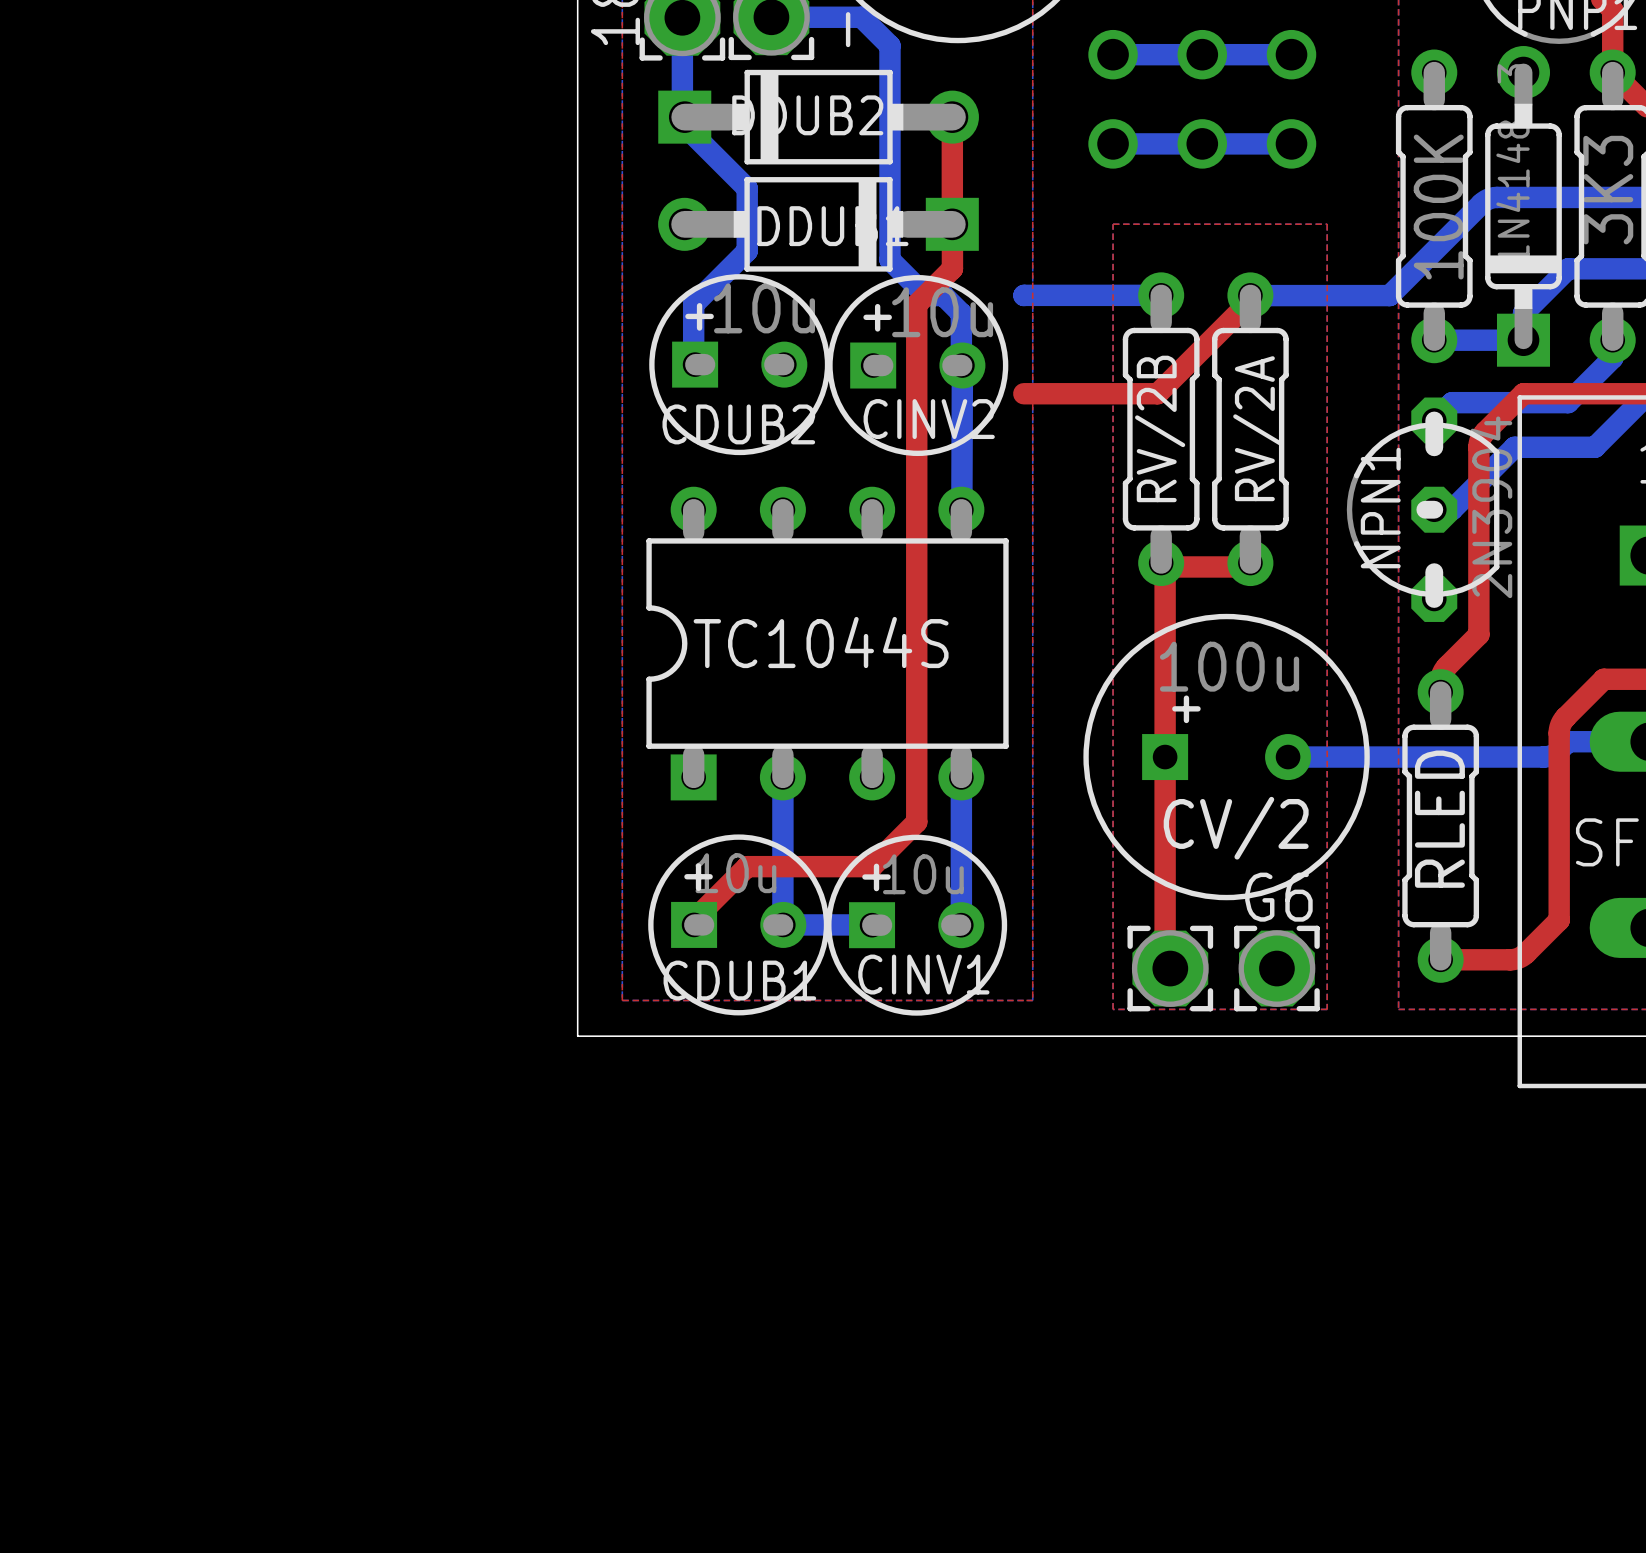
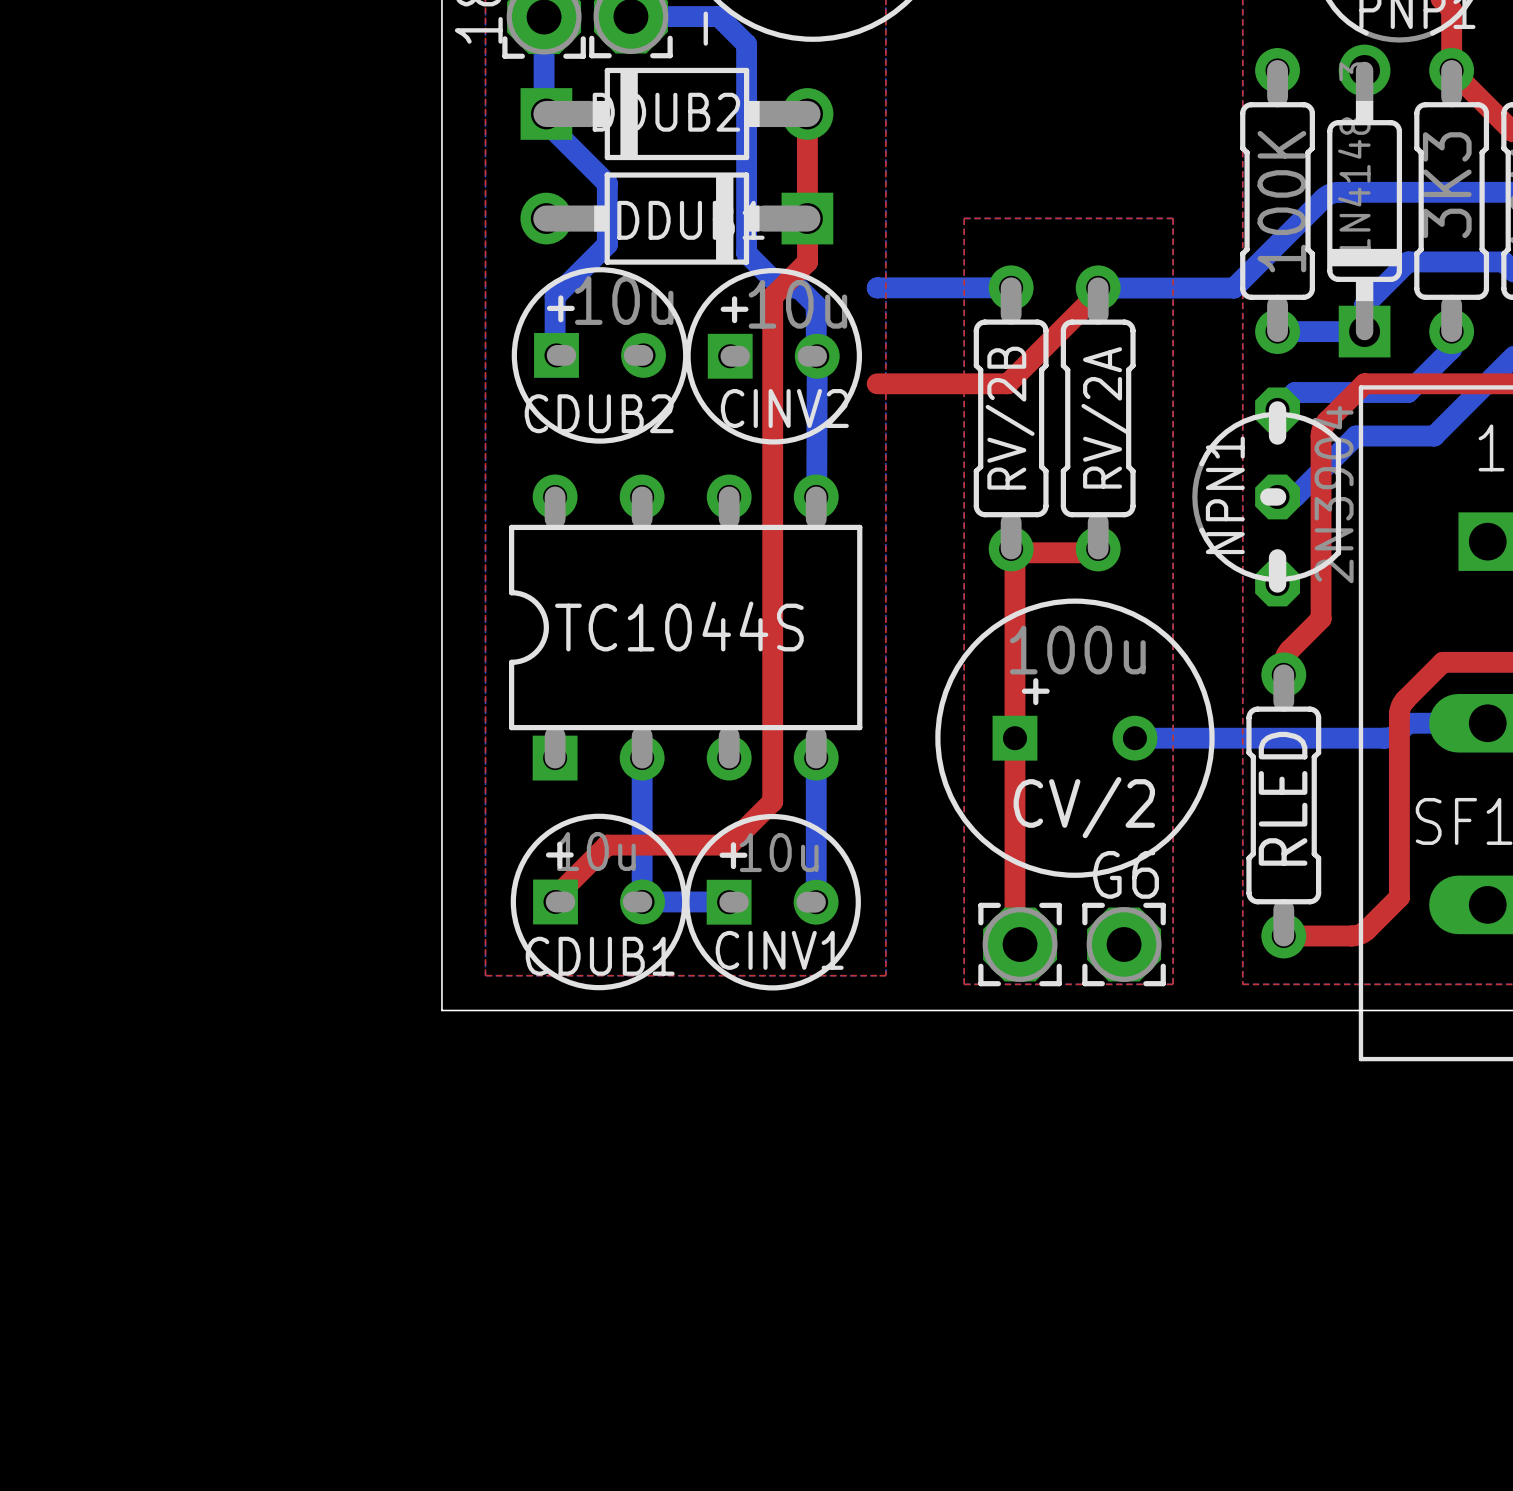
bottom track: (1113, 54) (1291, 54) -> none
via: (1113, 54) -> none
via: (1202, 54) -> none
via: (1291, 54) -> none
bottom track: (1113, 143) (1291, 143) -> none
via: (1113, 143) -> none
via: (1202, 143) -> none
via: (1291, 143) -> none

